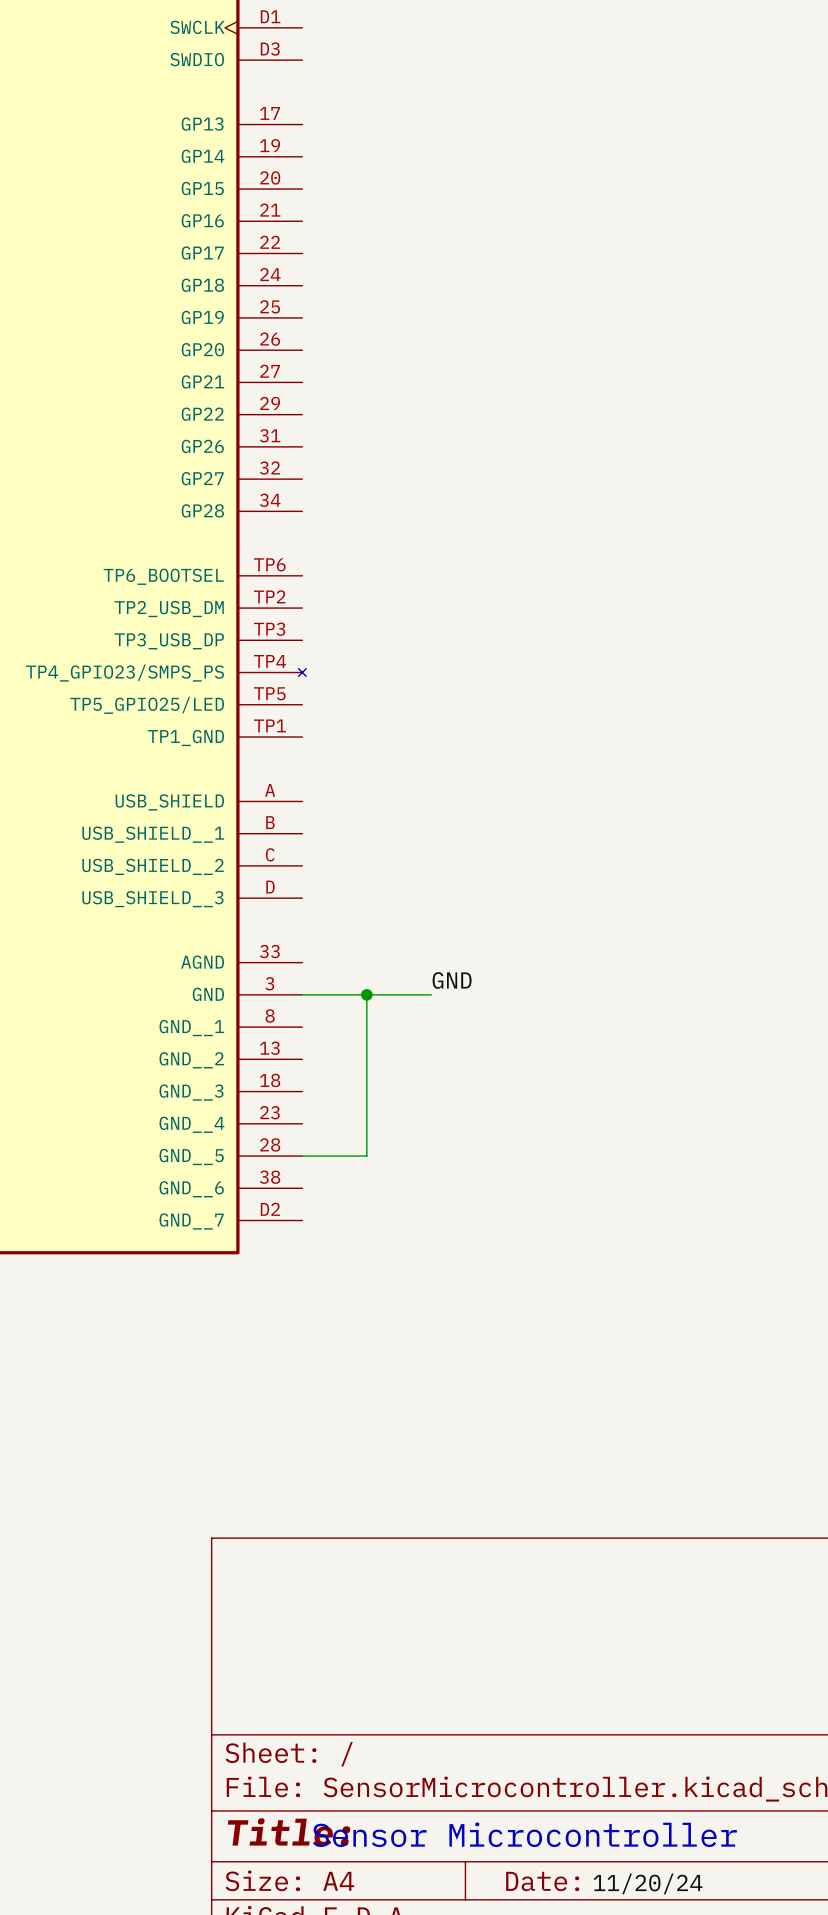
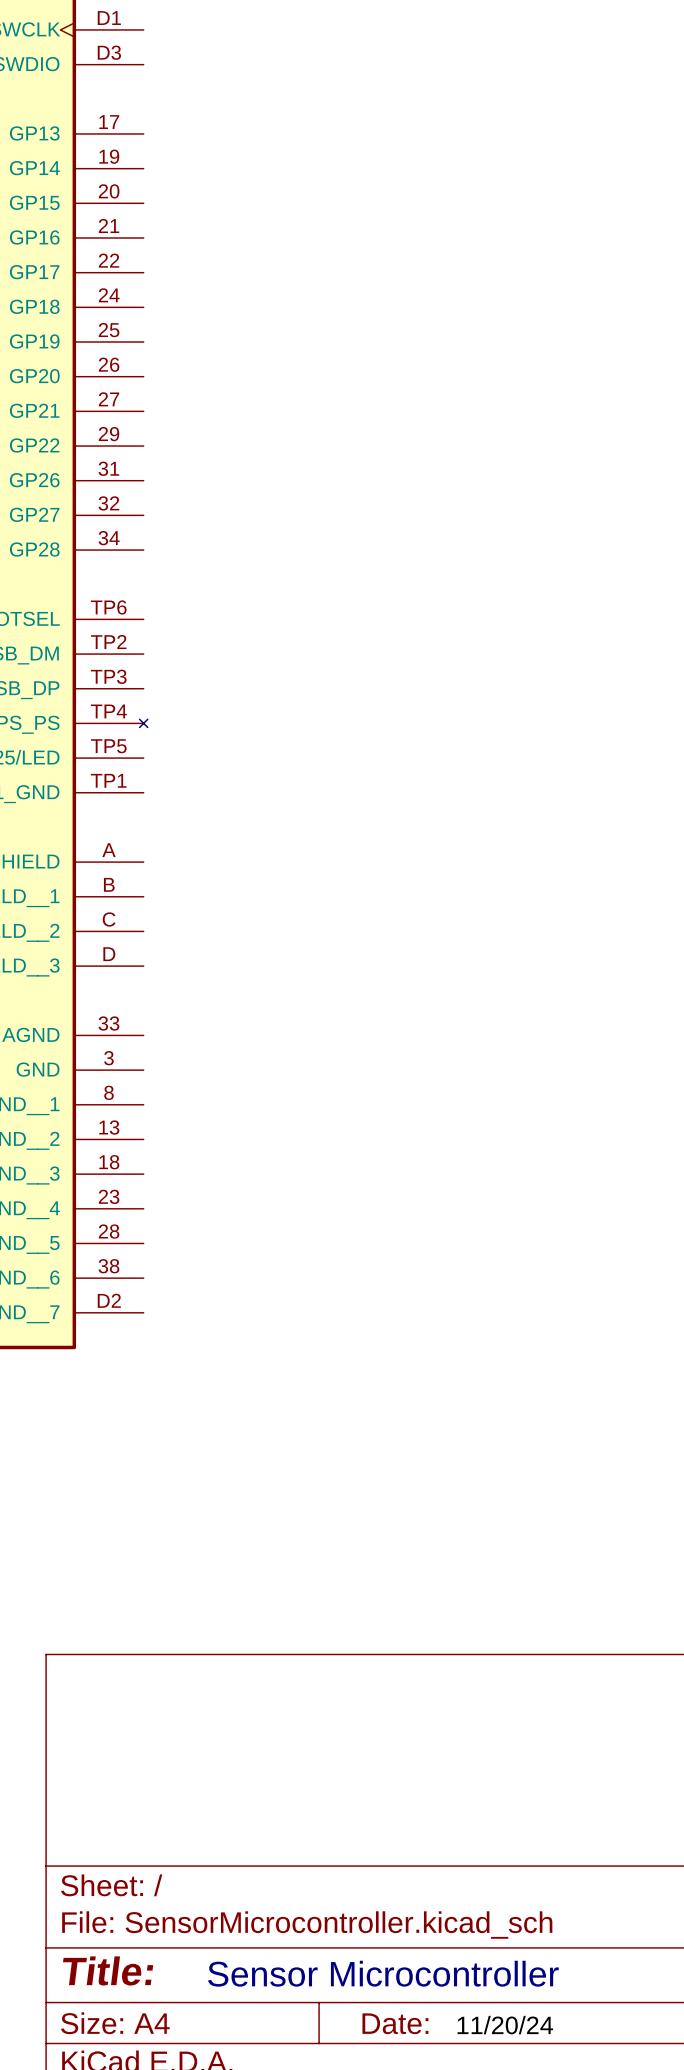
label: GND (452, 980) -> none
wire: (302, 994) (431, 994) -> none
wire: (366, 994) (366, 1156) (302, 1156) -> none
junction: (366, 994) -> none

